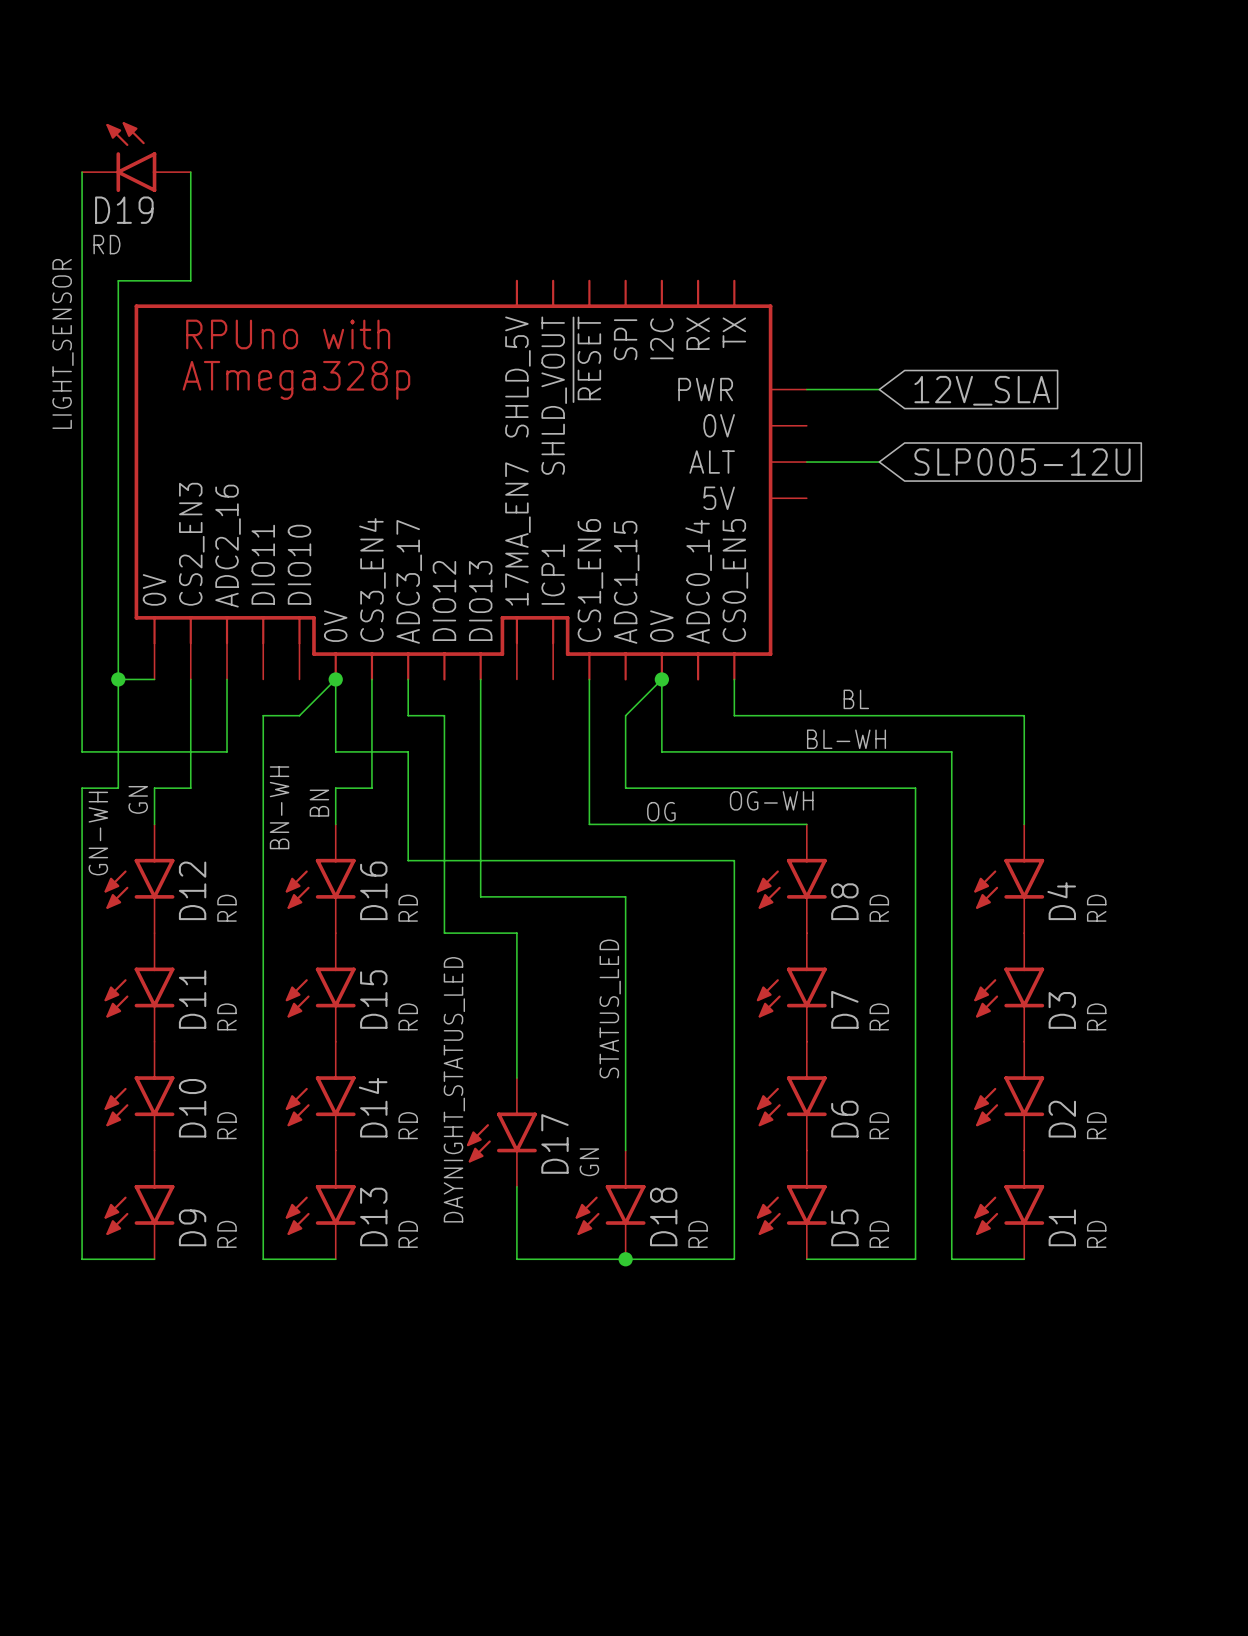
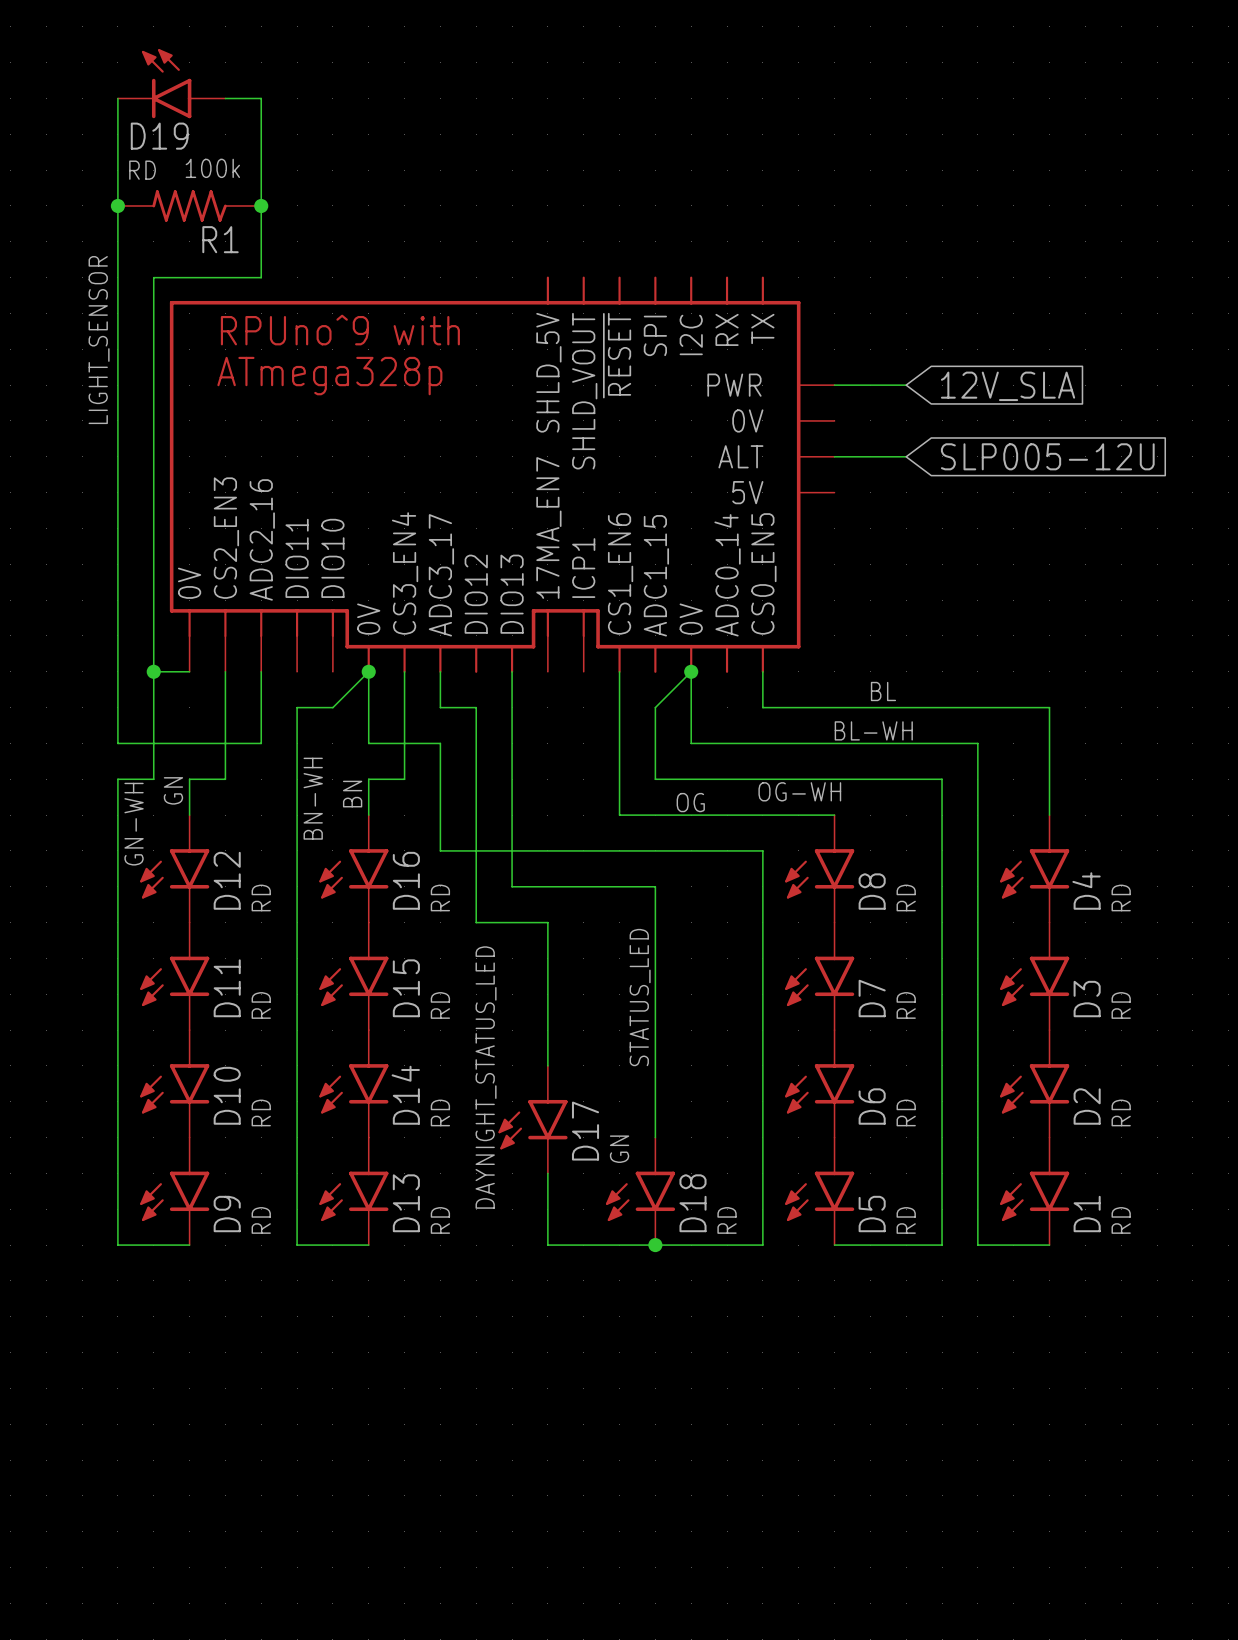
wire: none -> (117, 98) (117, 170)
D19 position: (136, 157) -> (171, 83)
wire: (190, 172) (190, 280) -> (225, 98) (261, 98) (261, 277) (225, 277)
junction: none -> (117, 205)
R1: none -> 100k (189, 205)
junction: none -> (261, 205)
part text: RPUno with (288, 334) -> RPUno^9 with (340, 330)

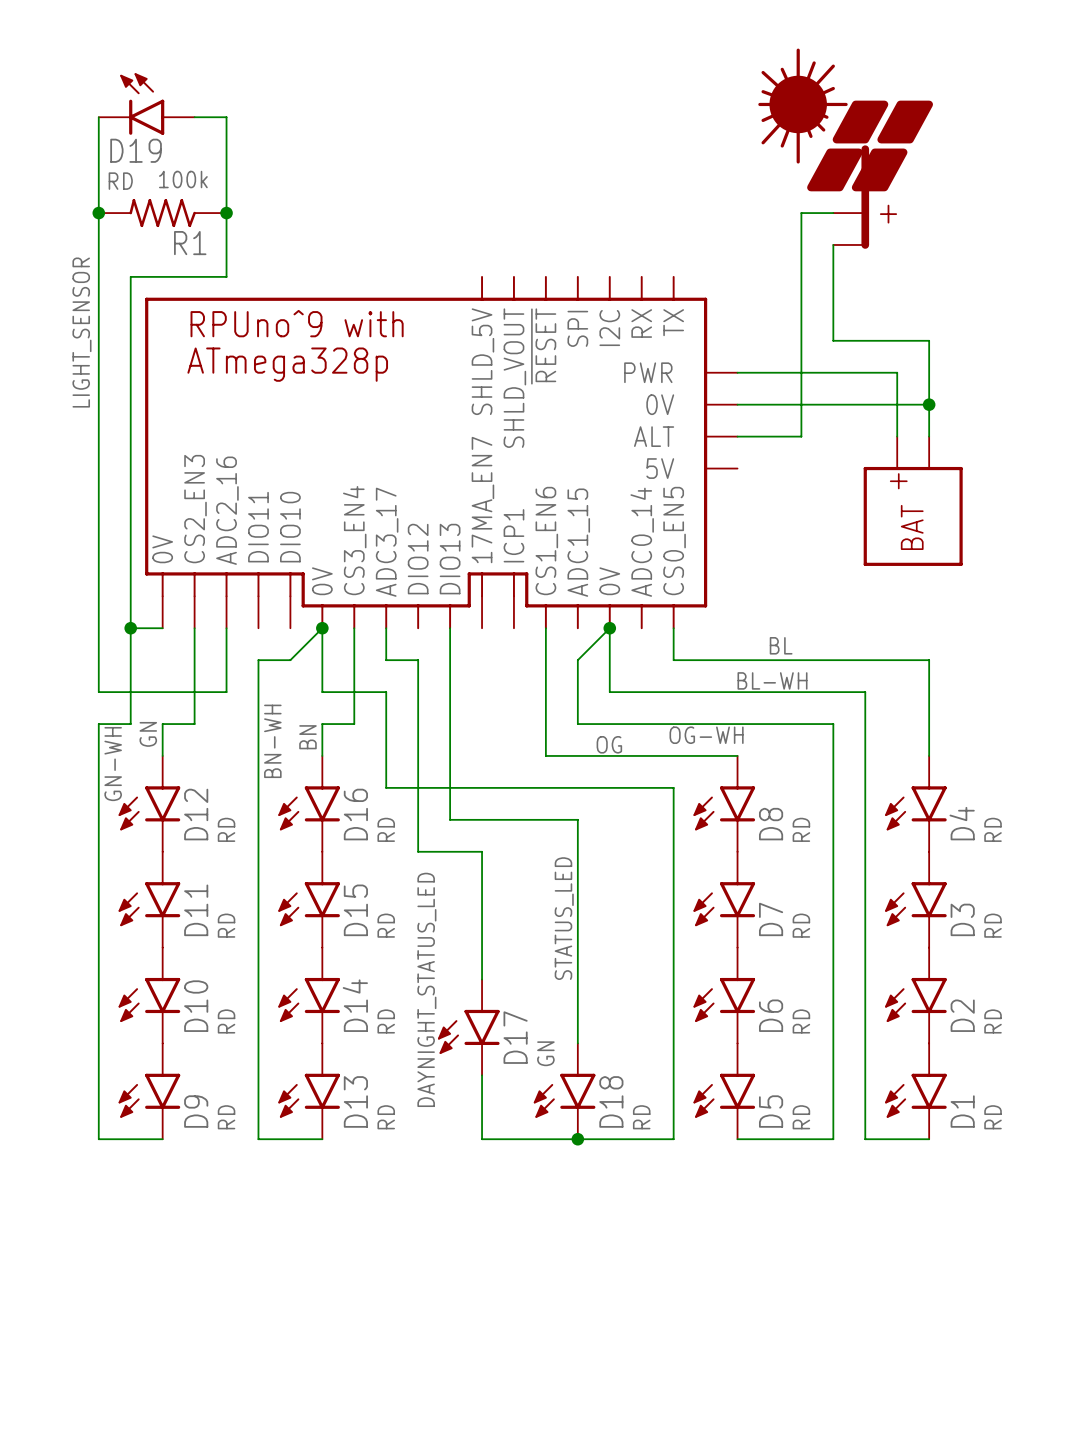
part: none -> (845, 148)
wire: none -> (833, 213) (801, 213) (801, 436)
wire: none -> (833, 244) (833, 340) (929, 340) (929, 436)
wire: none -> (801, 372) (897, 372) (897, 436)
global label: 12V_SLA (1008, 386) -> none
wire: none -> (737, 404) (929, 404)
junction: none -> (929, 404)
global label: SLP005-12U (1047, 456) -> none
part: none -> (913, 501)

